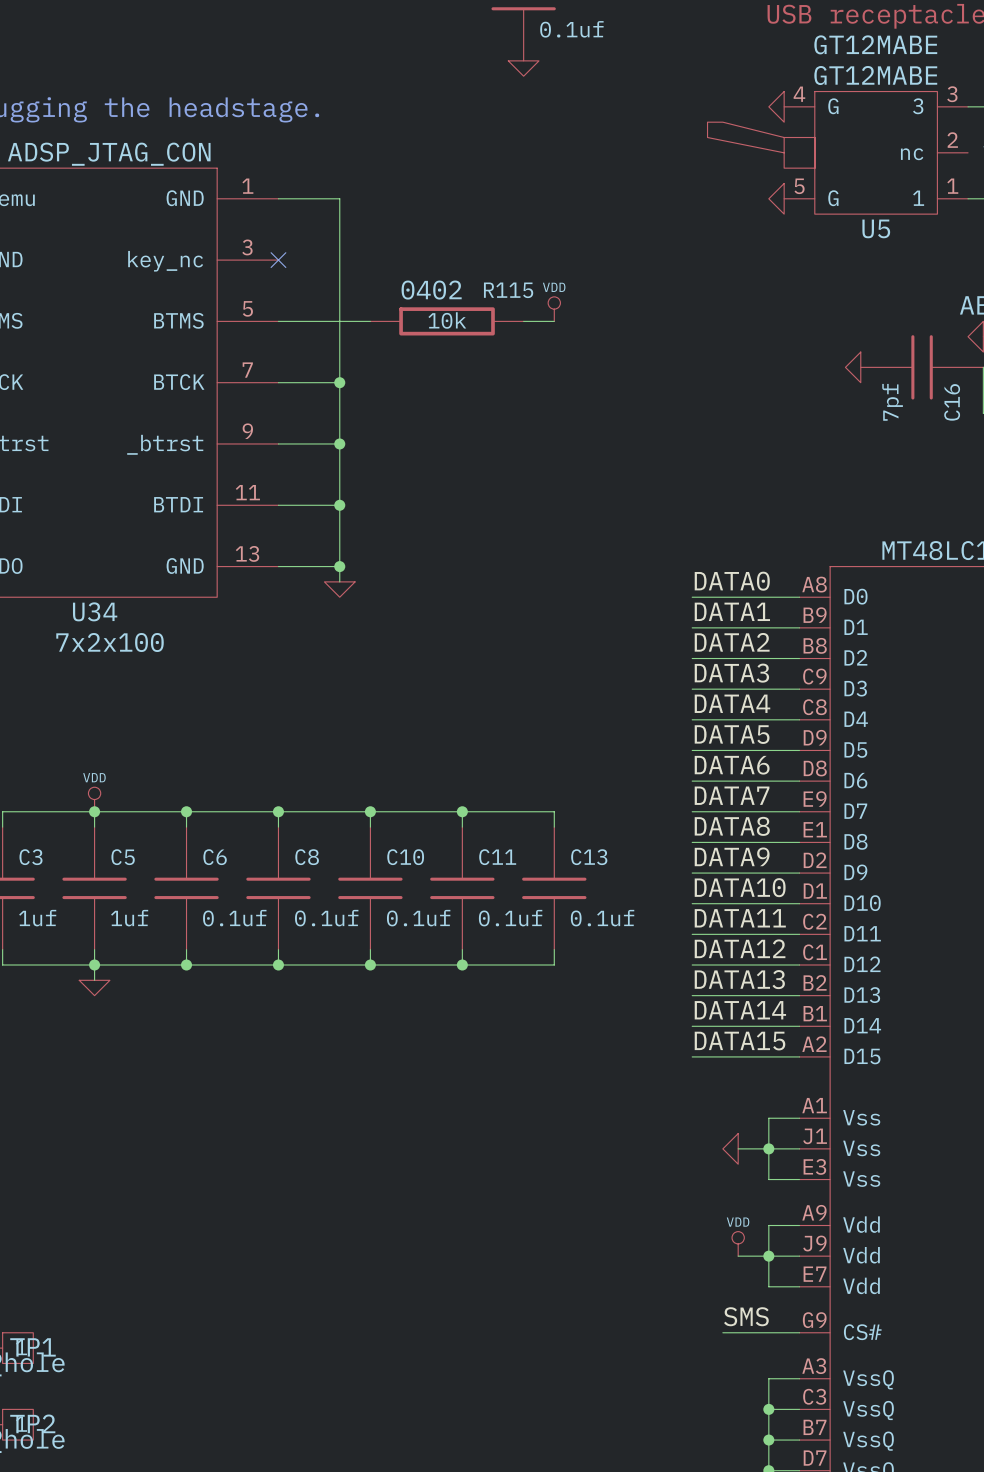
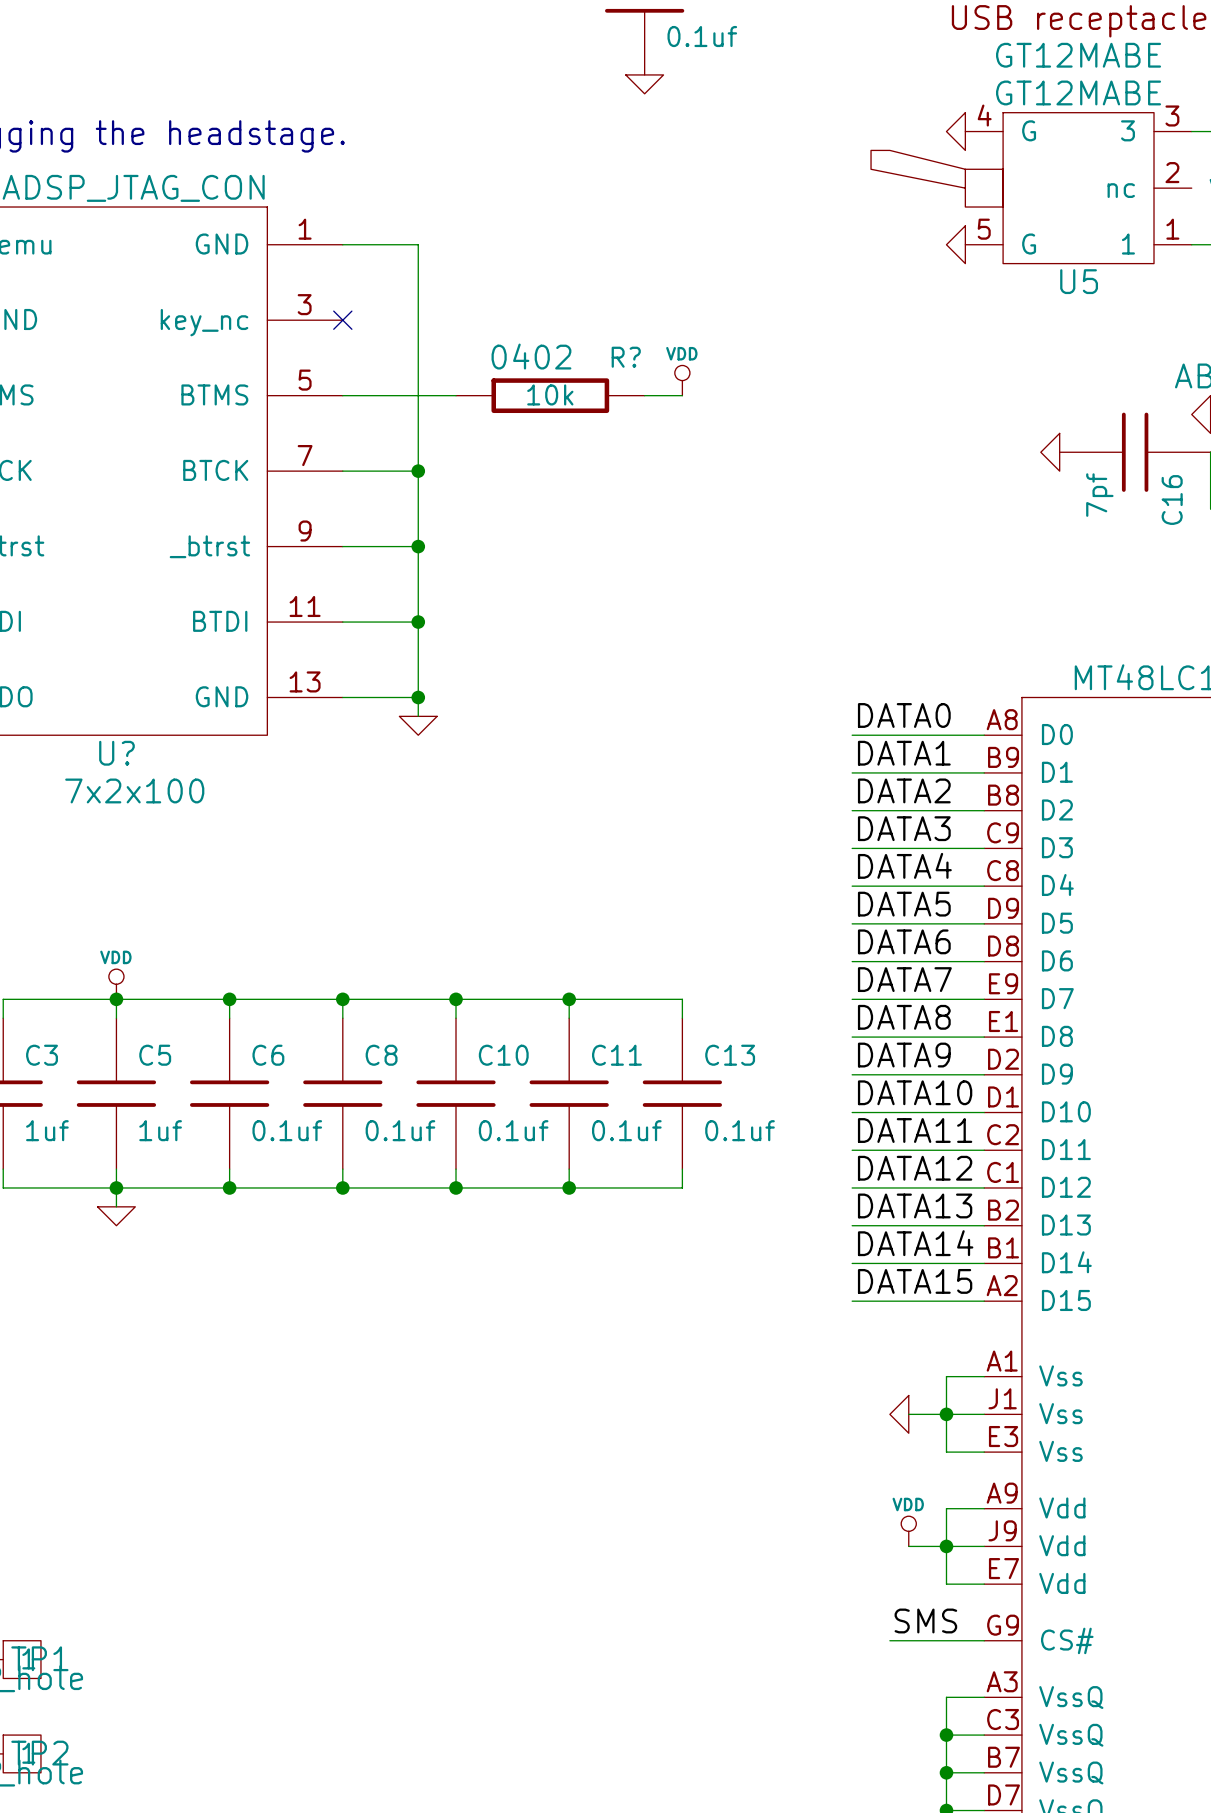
R115 name: R115 (508, 290) -> R? (626, 357)
U34 name: U34 (95, 611) -> U? (116, 753)

